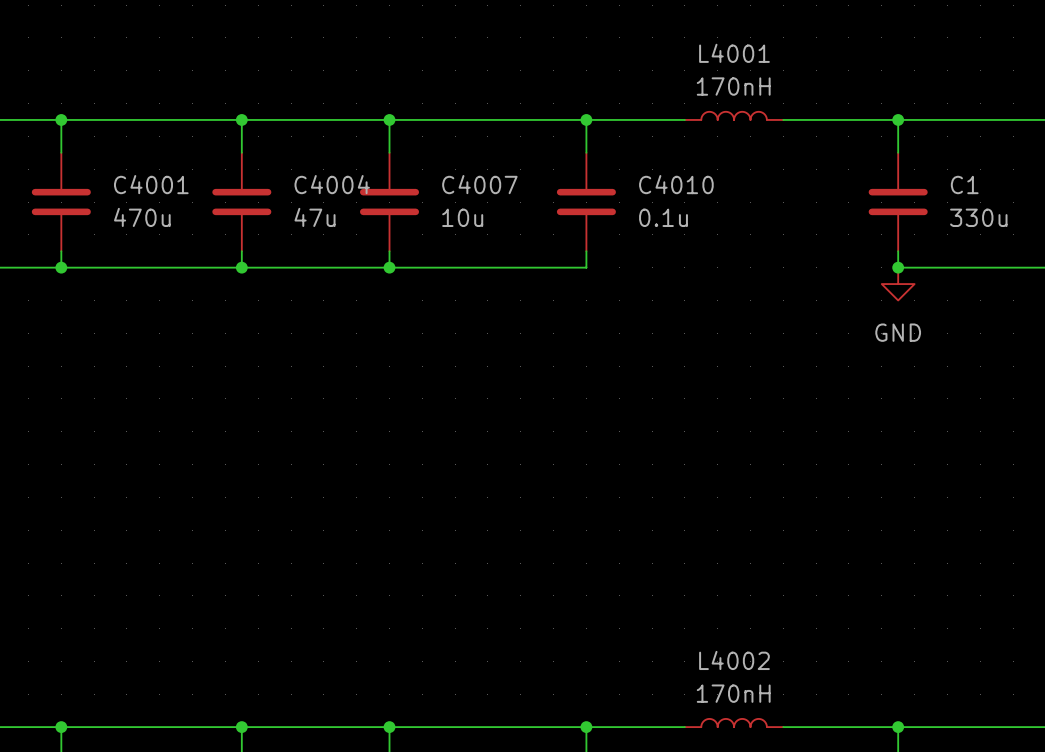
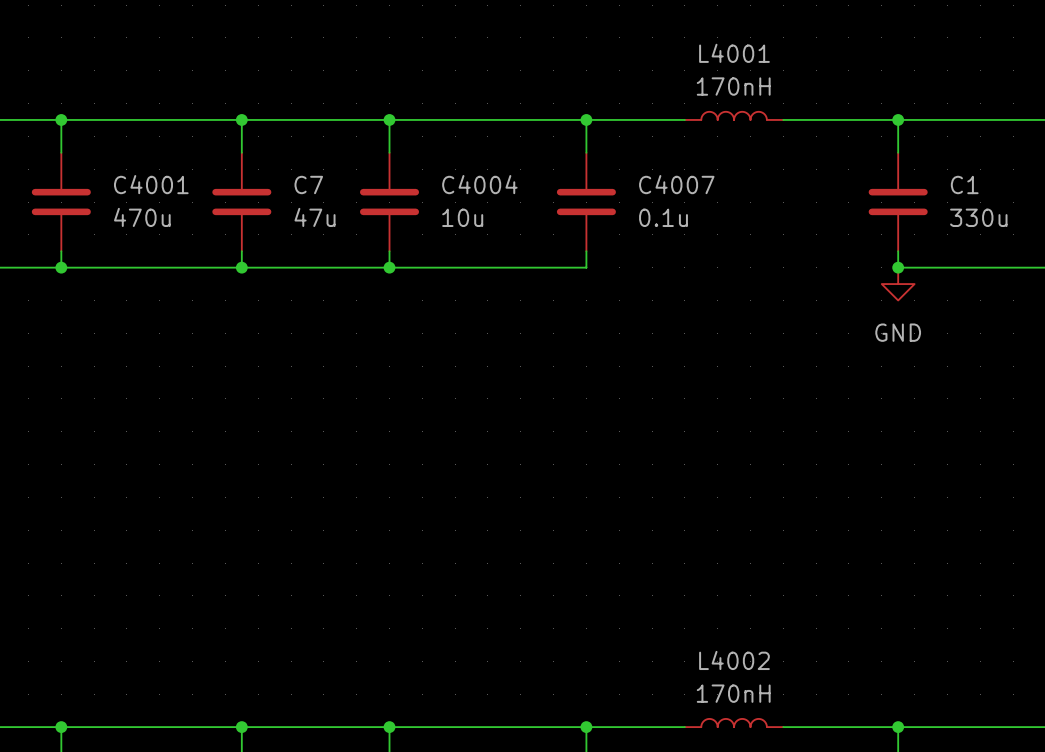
C4004 name: C4004 (332, 184) -> C7 (308, 184)
C4007 name: C4007 (479, 184) -> C4004 (479, 184)
C4010 name: C4010 (676, 184) -> C4007 (676, 184)

